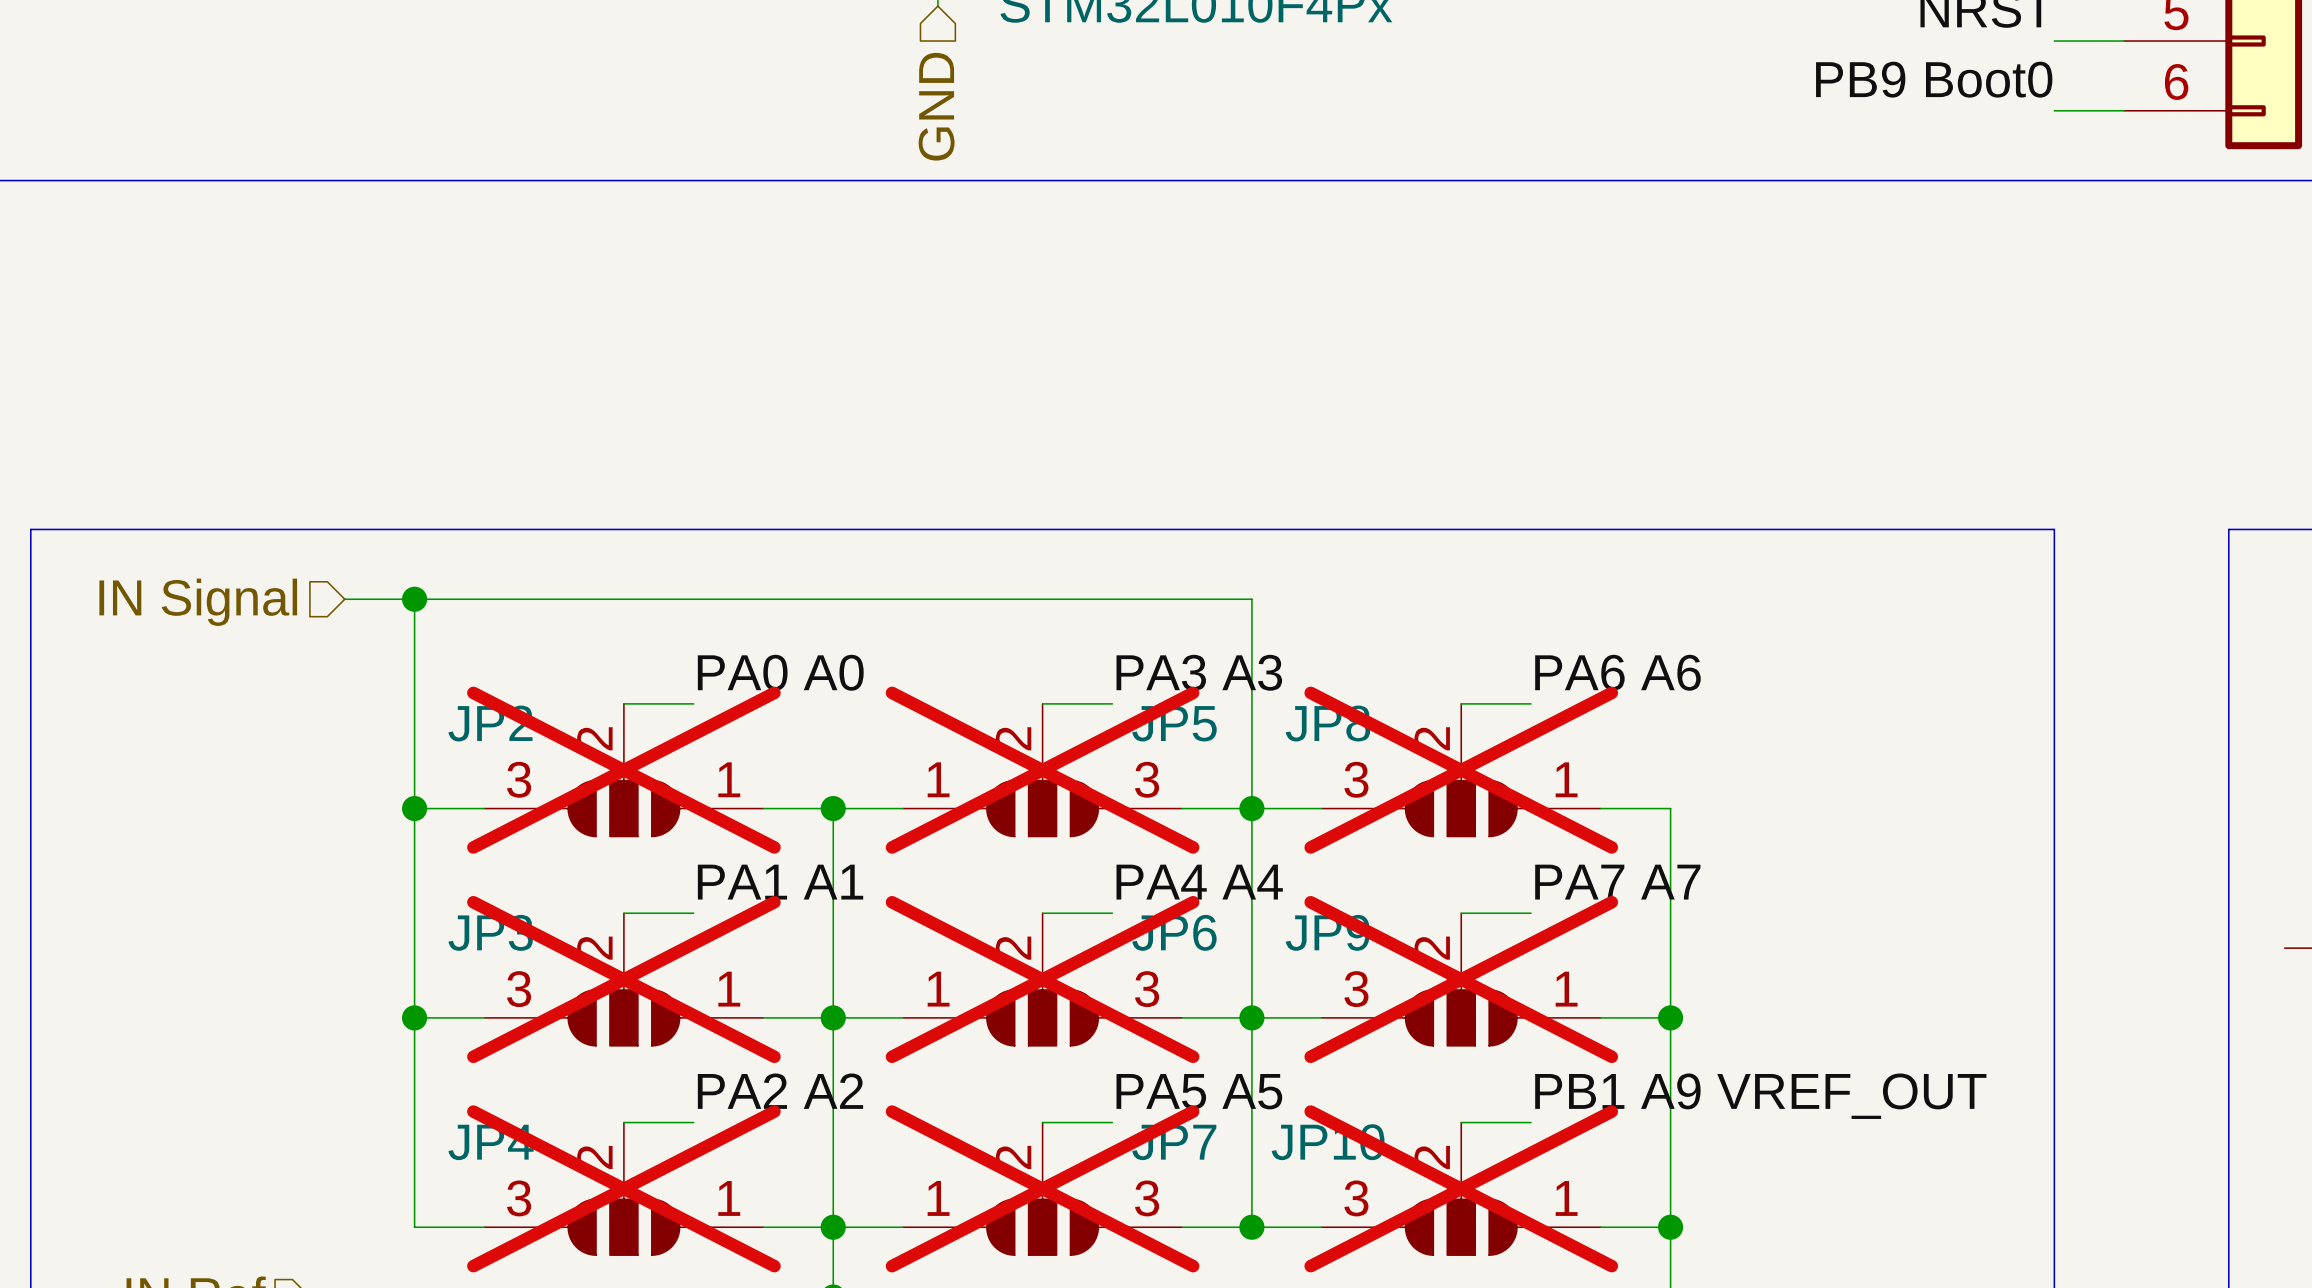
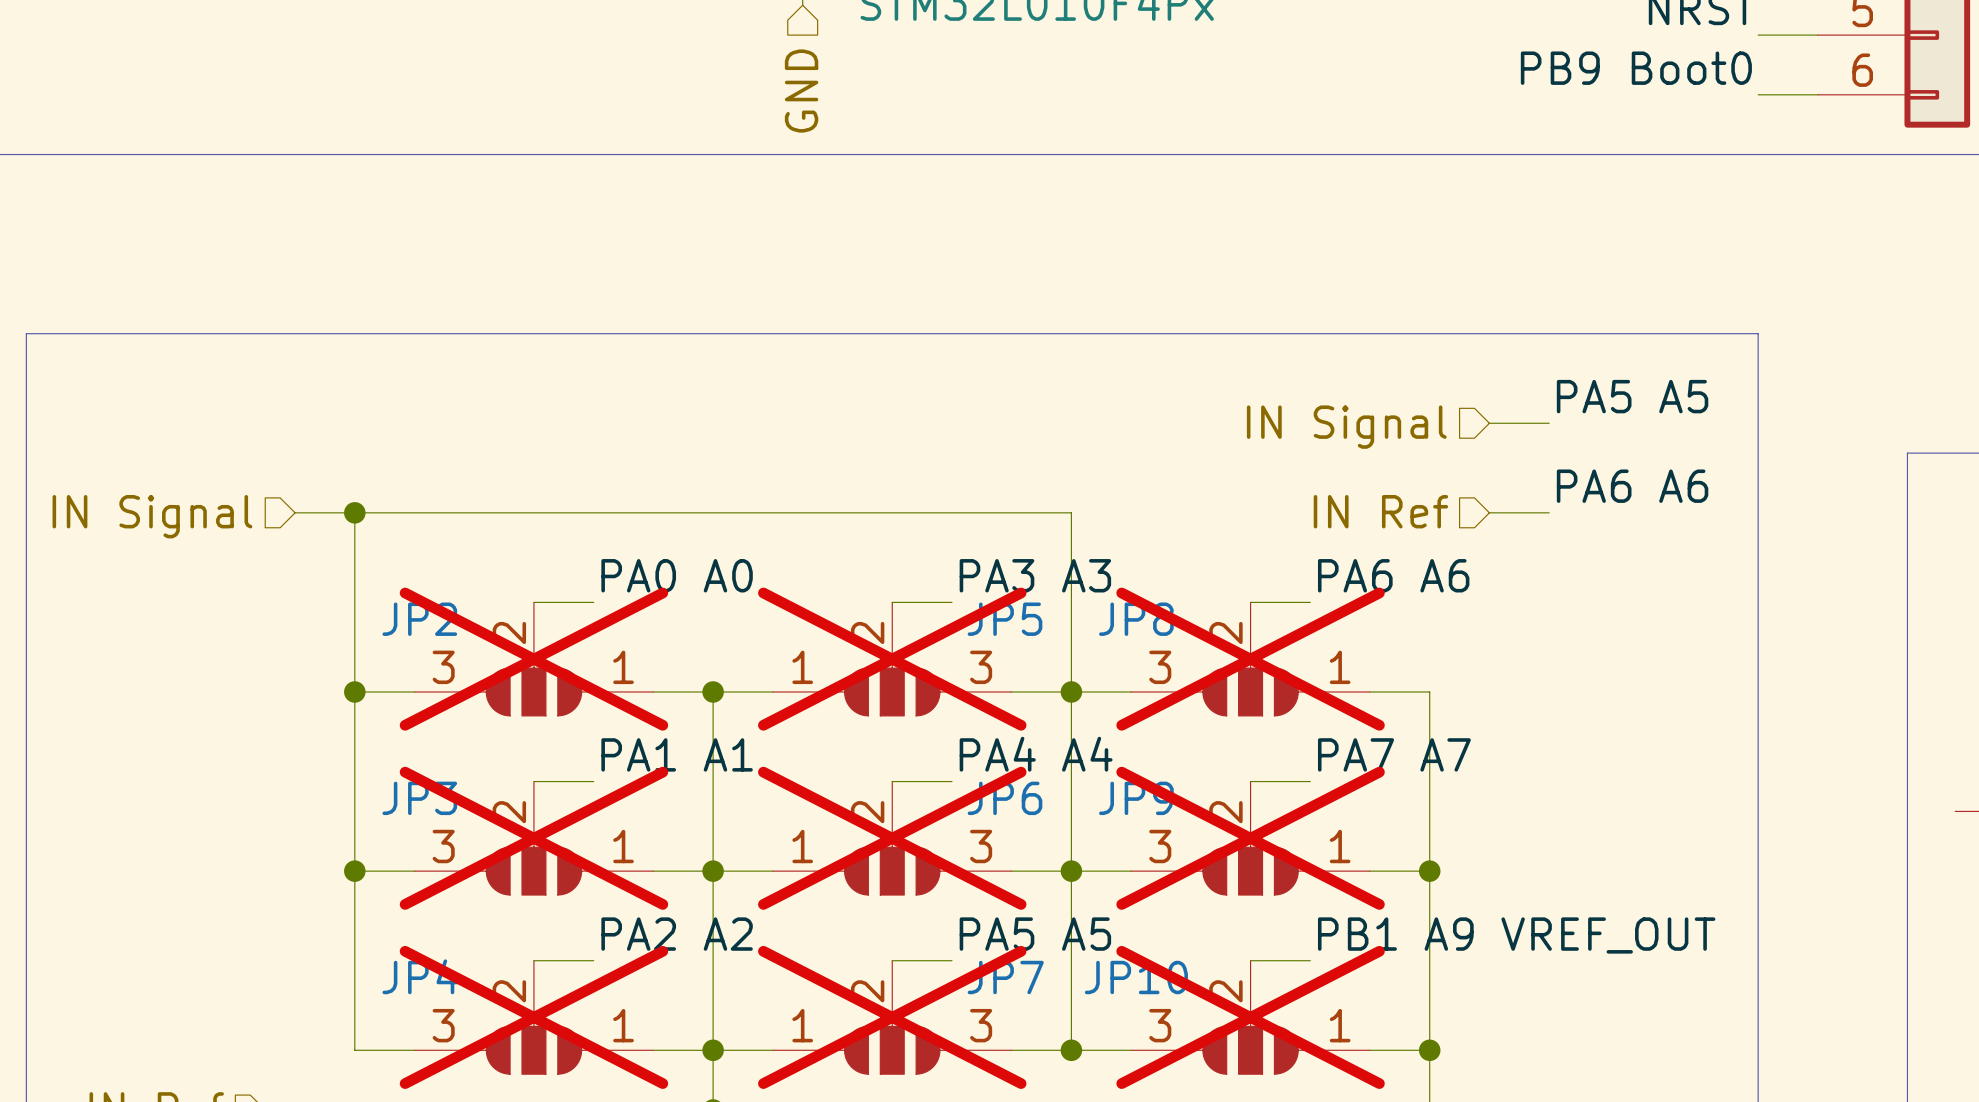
label: none -> PA5 A5 (1632, 396)
wire: none -> (1489, 423) (1549, 423)
hierarchical label: none -> IN Signal (1346, 427)
line: (30, 529) (2054, 529) -> (26, 453) (26, 333) (1758, 333) (1758, 453)
label: none -> PA6 A6 (1632, 486)
hierarchical label: none -> IN Ref (1380, 511)
wire: none -> (1489, 512) (1549, 512)

